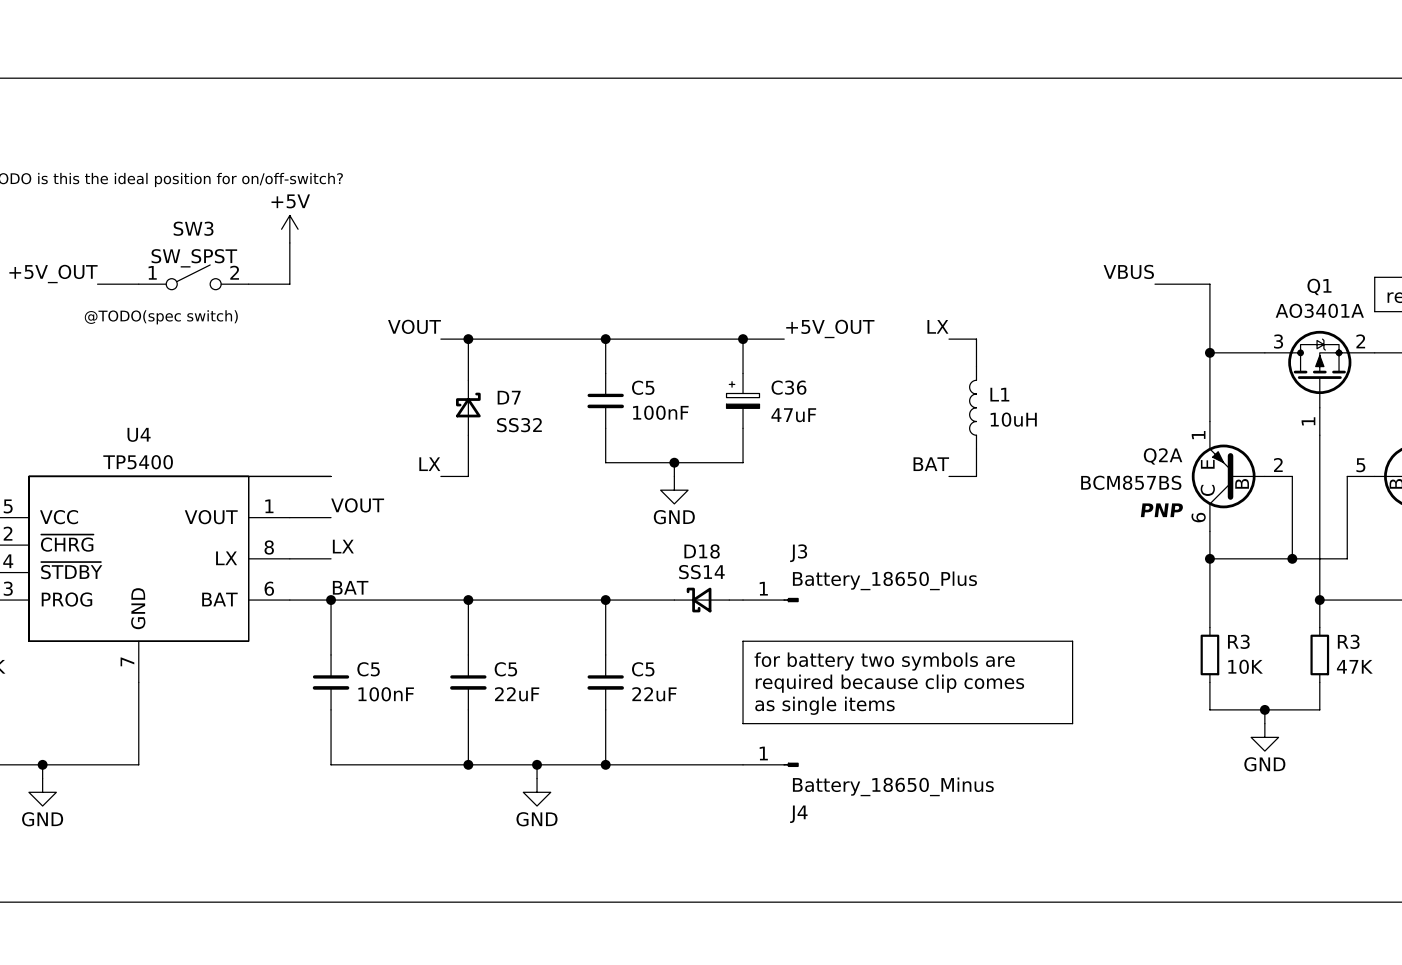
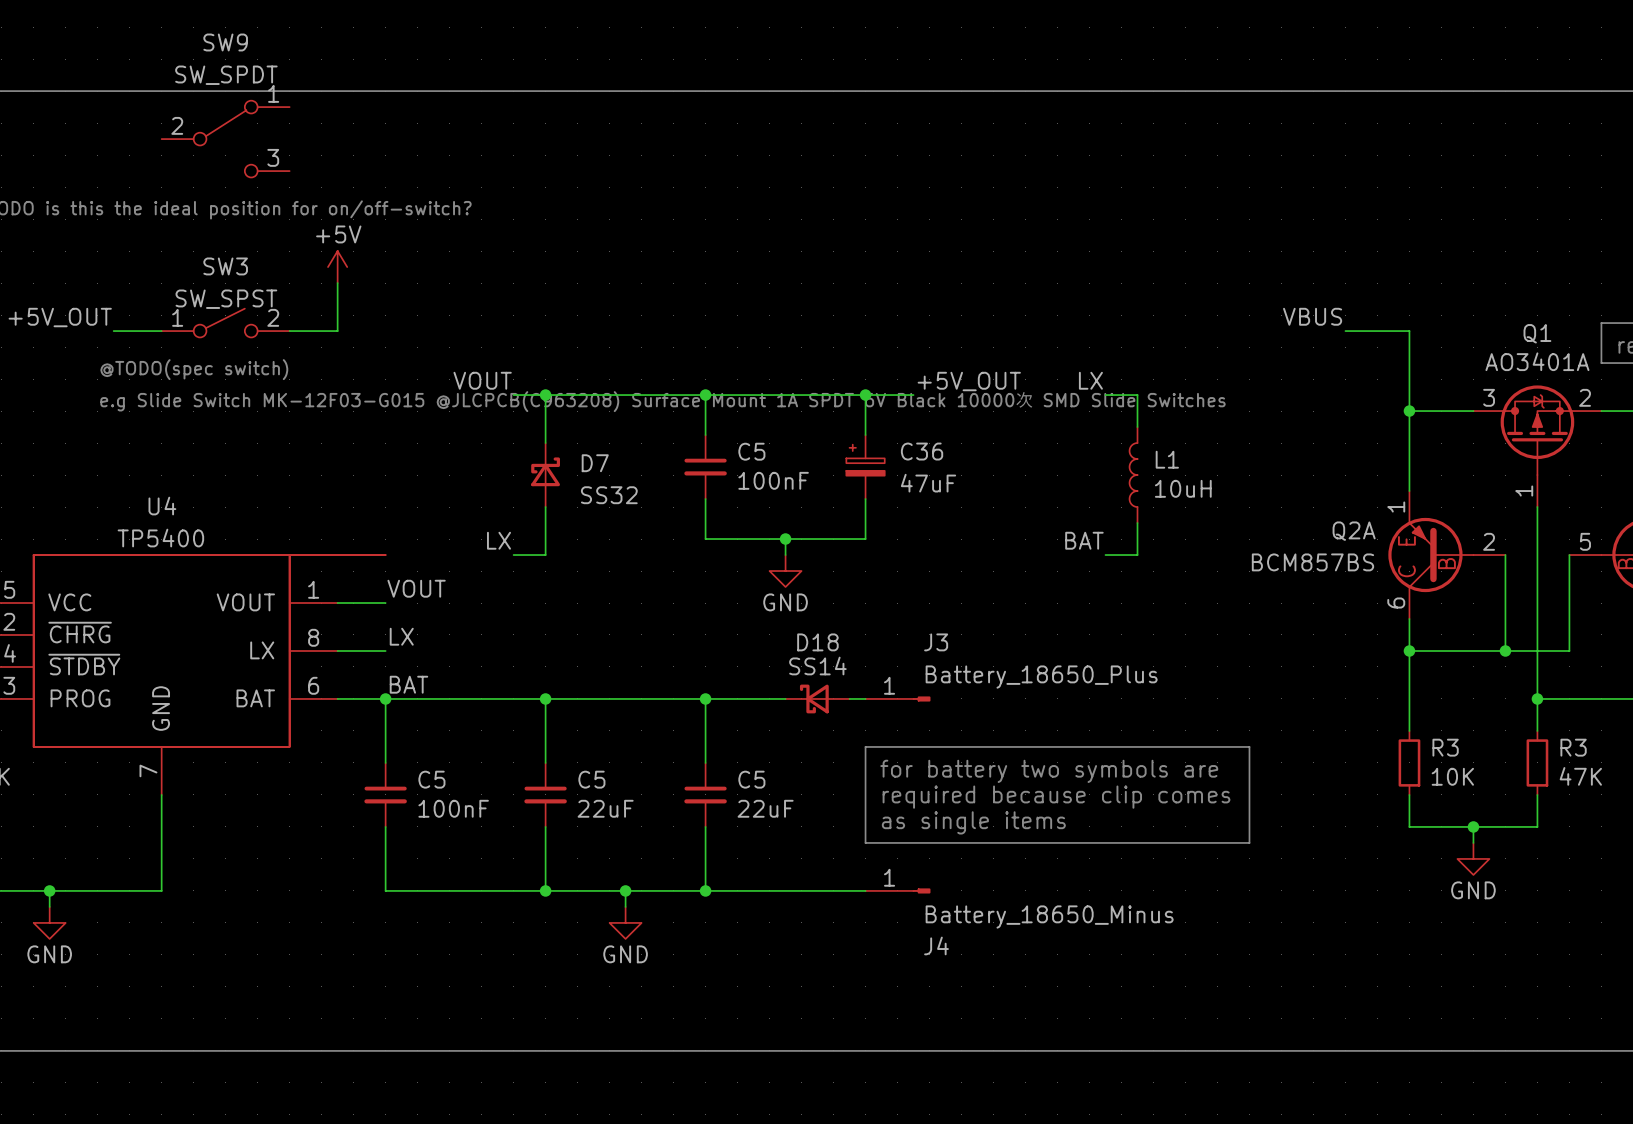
SW9: none -> SW_SPDT (225, 139)
text: none -> e.g Slide Switch MK-12F03-G015 @JLCPCB(C963208) Surface Mount 1A SPDT 6V Black 10000次 SMD Slide Switches (663, 401)
Q2A text: PNP (1161, 510) -> none

